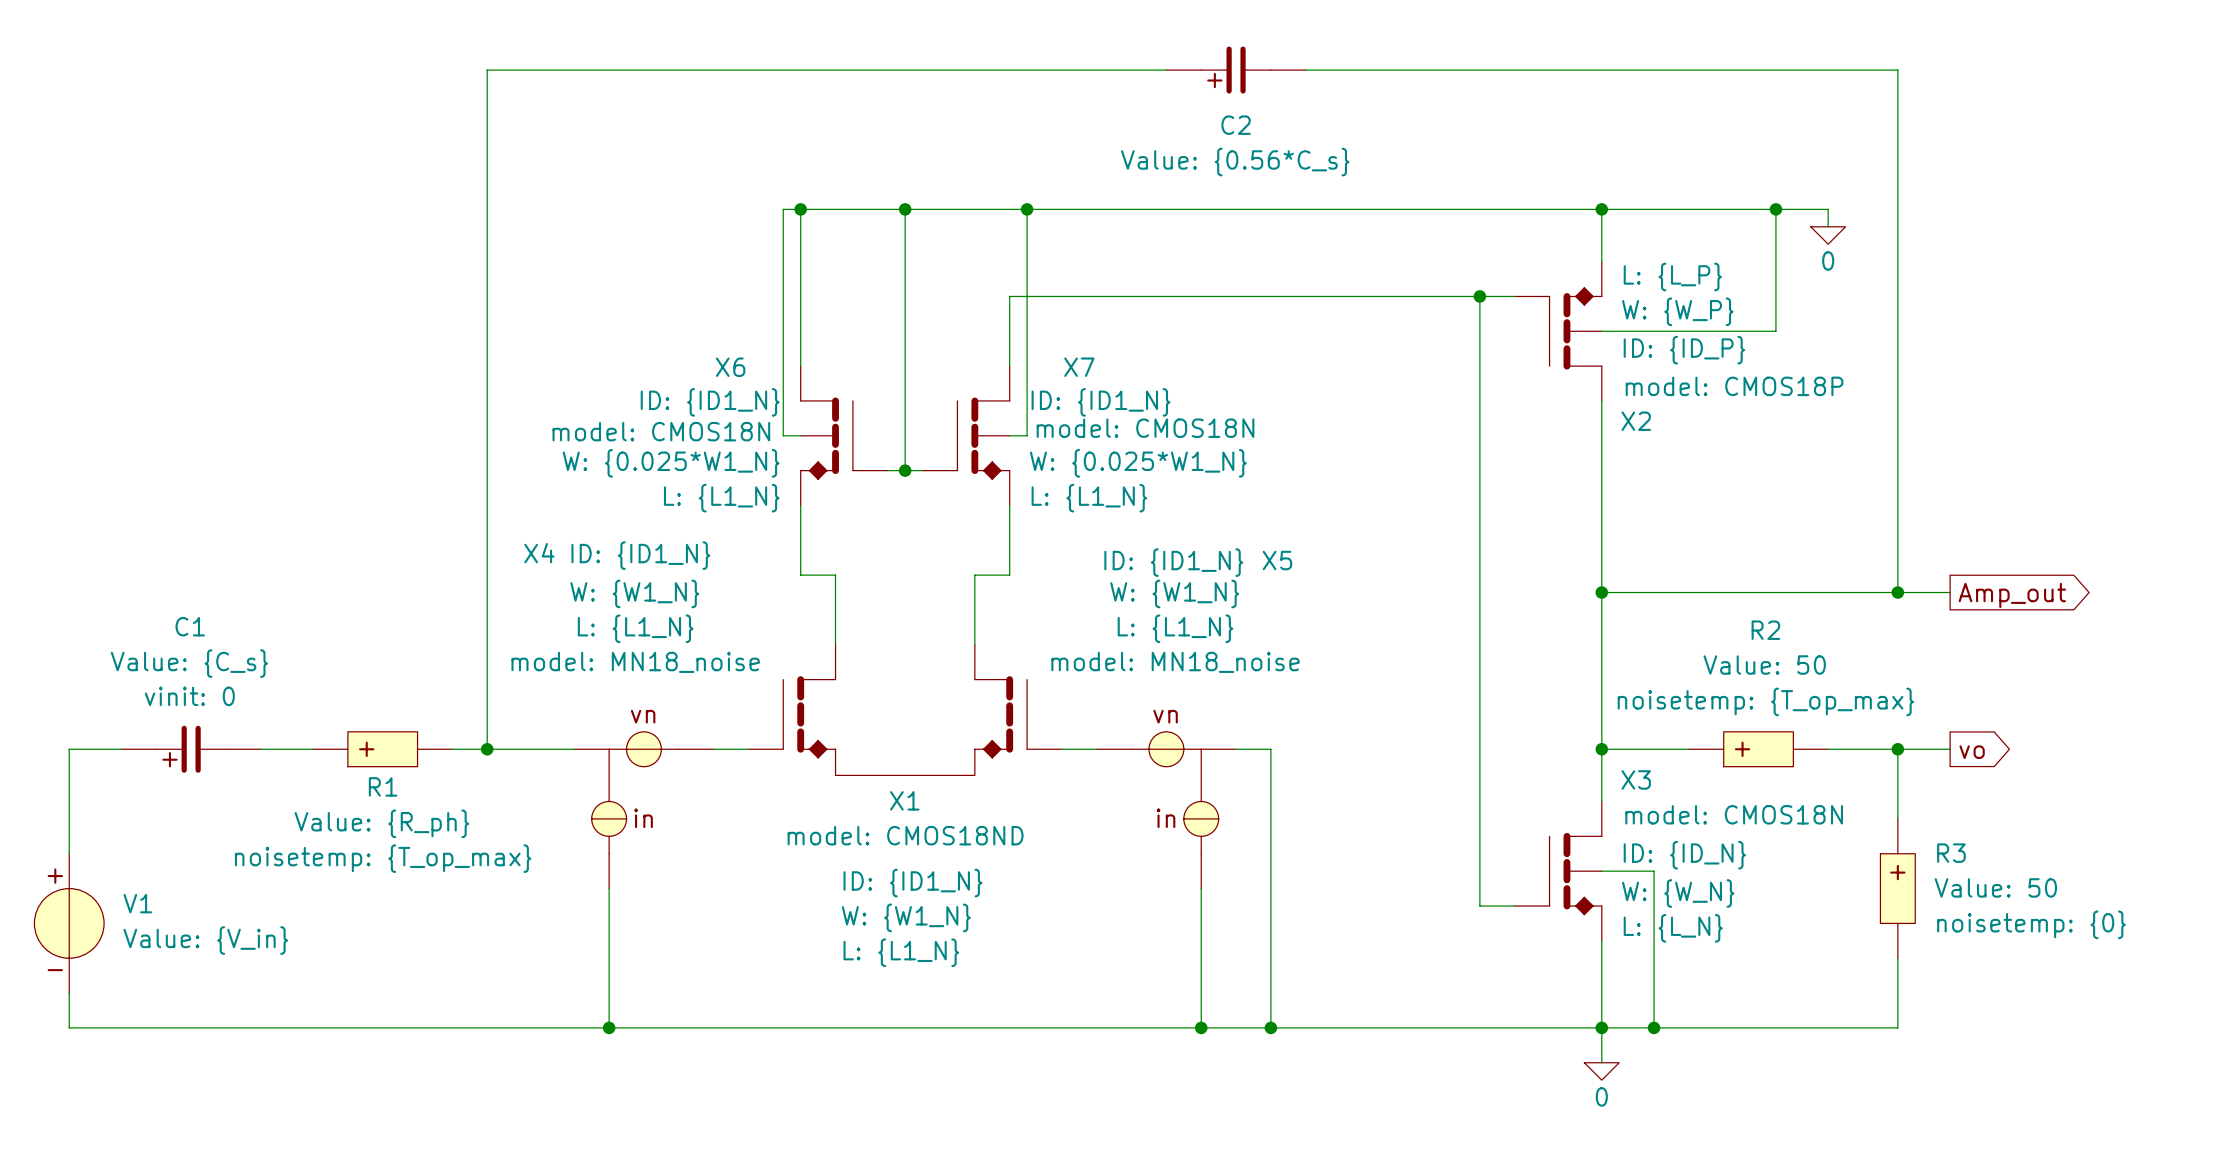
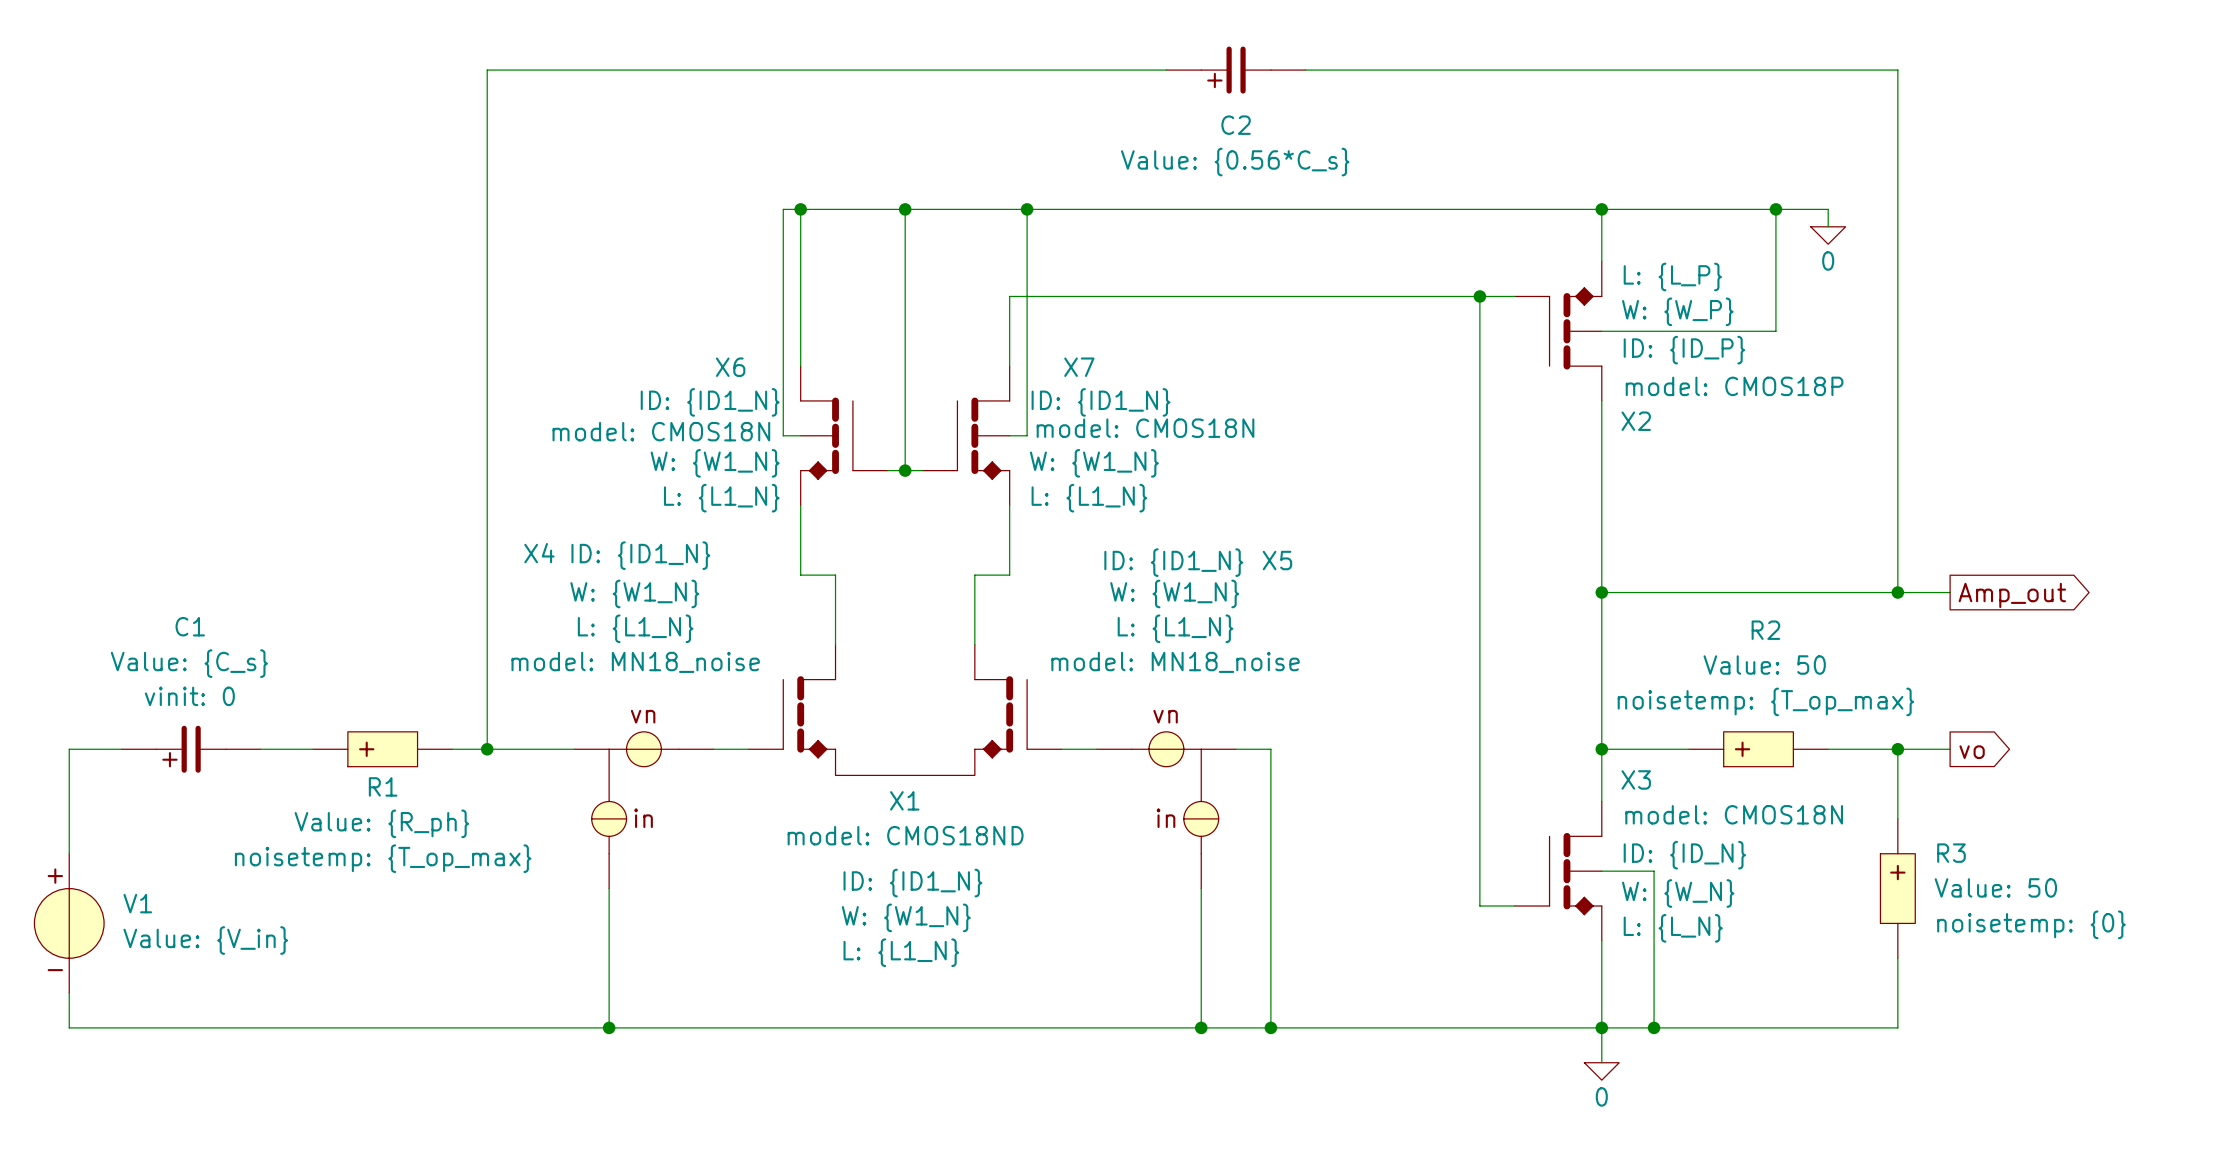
X6 text: W: {0.025*W1_N} (671, 463) -> W: {W1_N} (715, 463)
X7 text: W: {0.025*W1_N} (1138, 463) -> W: {W1_N} (1094, 463)

